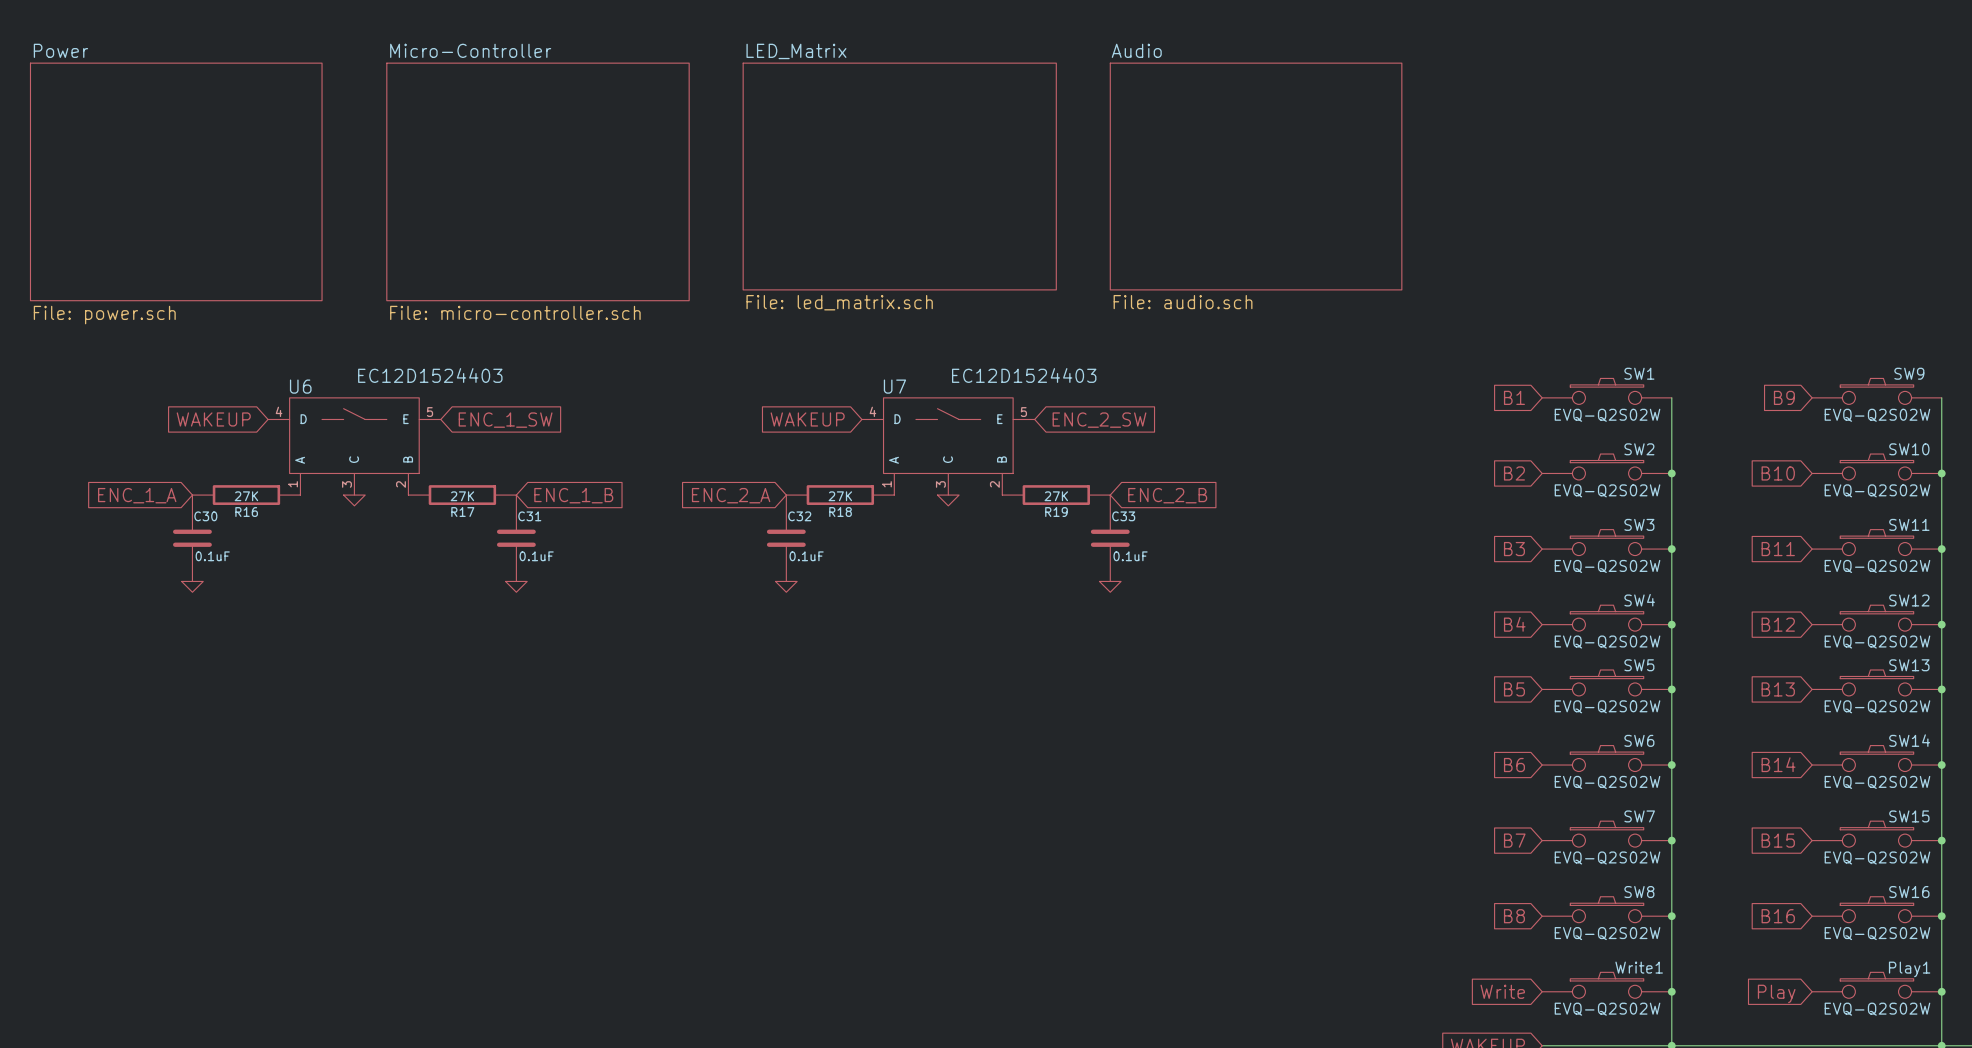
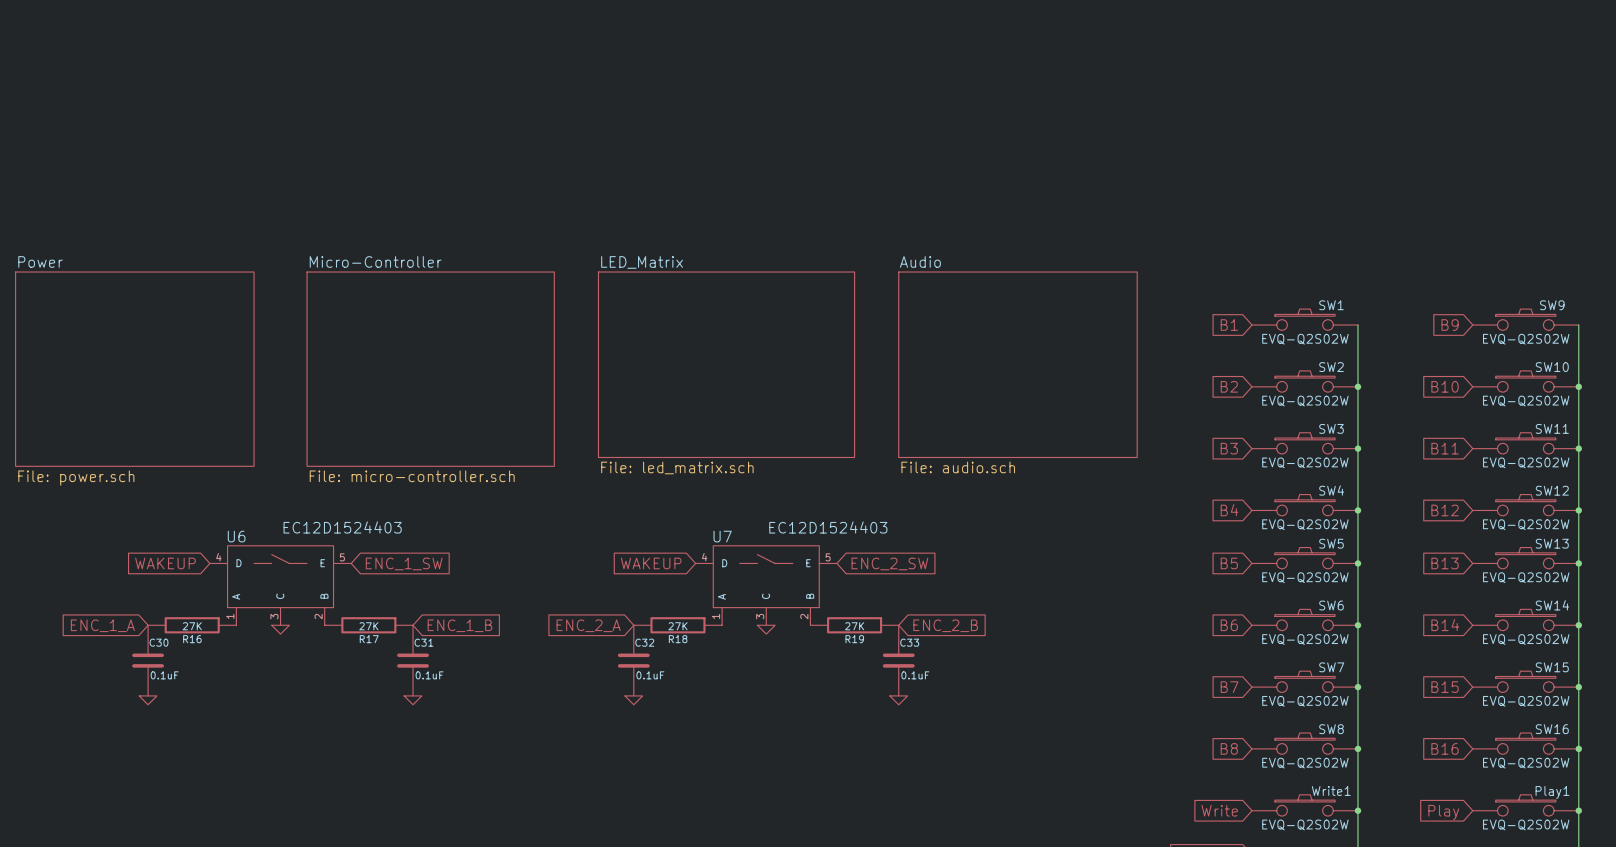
sheet LED_Matrix: File: led_matrix.sch (899, 176) -> none
sheet Audio: File: audio.sch (1256, 176) -> none
sheet Power: File: power.sch (176, 181) -> none
sheet Micro-Controller: File: micro-controller.sch (537, 181) -> none
global label: WAKEUP (213, 419) -> none
global label: WAKEUP (807, 419) -> none
global label: ENC_1_SW (505, 420) -> none
global label: ENC_2_SW (1099, 420) -> none
U6 position: (354, 446) -> (280, 585)
sheet LED_Matrix: none -> File: led_matrix.sch (726, 364)
U7 position: (948, 446) -> (766, 585)
sheet Audio: none -> File: audio.sch (1017, 364)
sheet Power: none -> File: power.sch (134, 369)
sheet Micro-Controller: none -> File: micro-controller.sch (430, 369)
global label: ENC_1_A (137, 495) -> none
R16 position: (246, 495) -> (192, 625)
R17 position: (462, 495) -> (368, 625)
global label: ENC_1_B (573, 495) -> none
global label: ENC_2_A (731, 495) -> none
R18 position: (840, 495) -> (677, 625)
R19 position: (1056, 495) -> (854, 625)
global label: ENC_2_B (1167, 495) -> none
power symbol: (354, 500) -> none
power symbol: (948, 500) -> none
C30 position: (192, 538) -> (148, 660)
C31 position: (516, 538) -> (413, 660)
C32 position: (786, 538) -> (633, 660)
C33 position: (1110, 538) -> (898, 660)
power symbol: (192, 586) -> none
power symbol: (516, 586) -> none
power symbol: (786, 586) -> none
power symbol: (1110, 586) -> none
global label: none -> WAKEUP (165, 563)
global label: none -> WAKEUP (651, 563)
global label: none -> ENC_1_SW (404, 563)
global label: none -> ENC_2_SW (889, 563)
global label: none -> ENC_1_A (102, 625)
global label: none -> ENC_1_B (459, 625)
global label: none -> ENC_2_A (588, 625)
global label: none -> ENC_2_B (945, 625)
power symbol: none -> (280, 629)
power symbol: none -> (766, 629)
power symbol: none -> (148, 700)
power symbol: none -> (413, 700)
power symbol: none -> (633, 700)
power symbol: none -> (898, 700)

